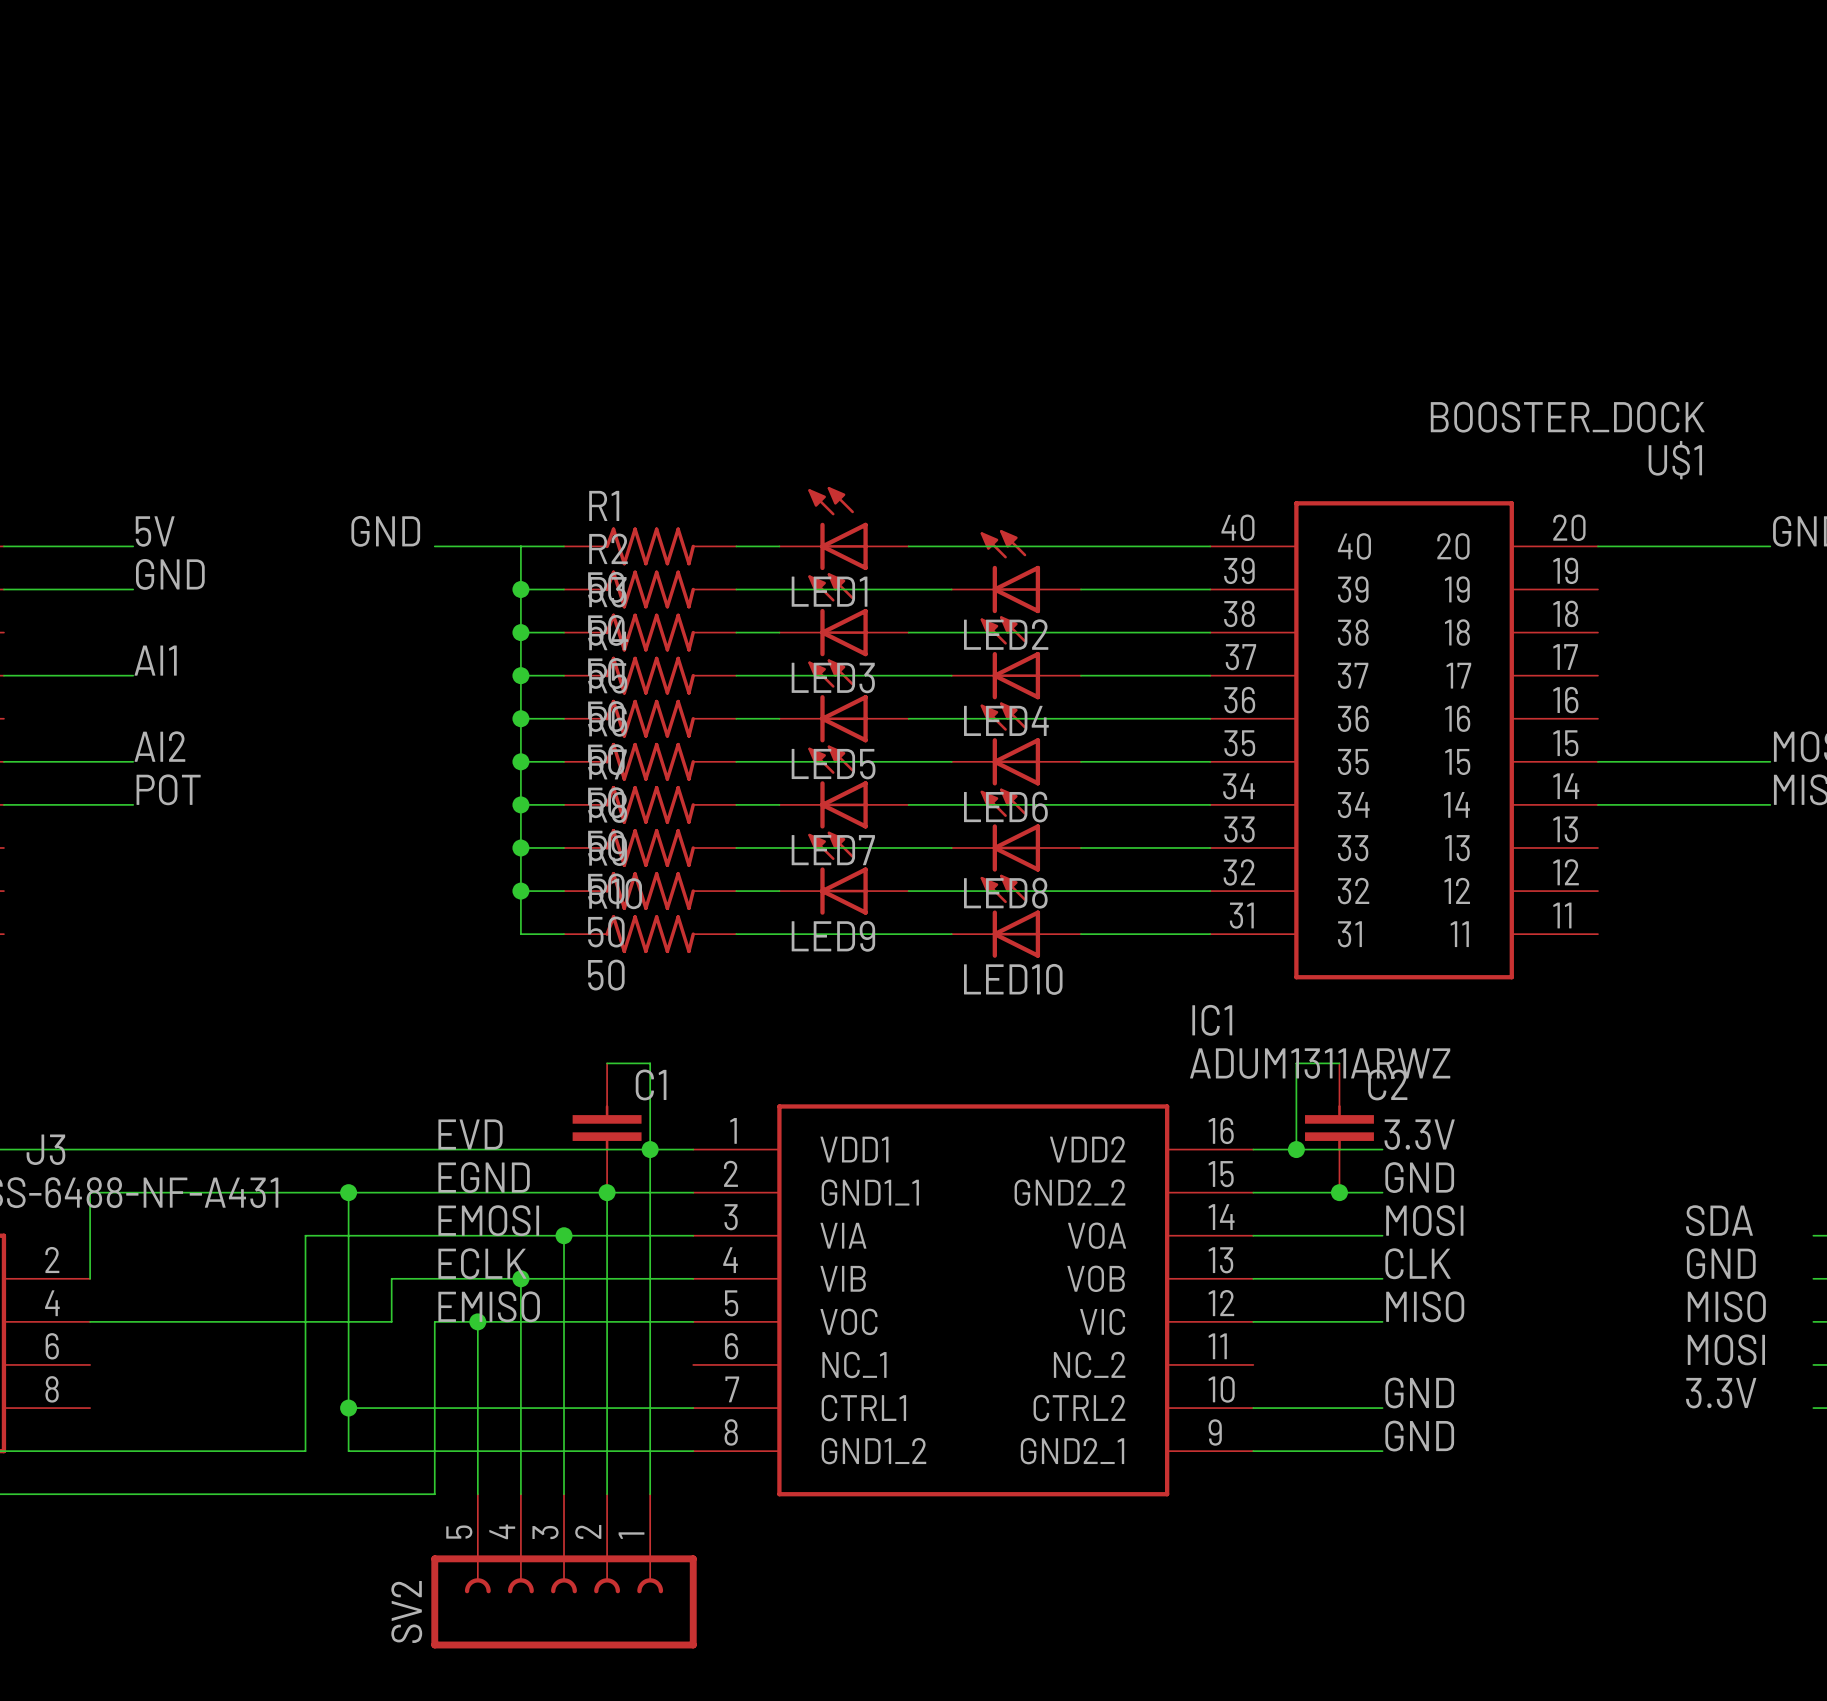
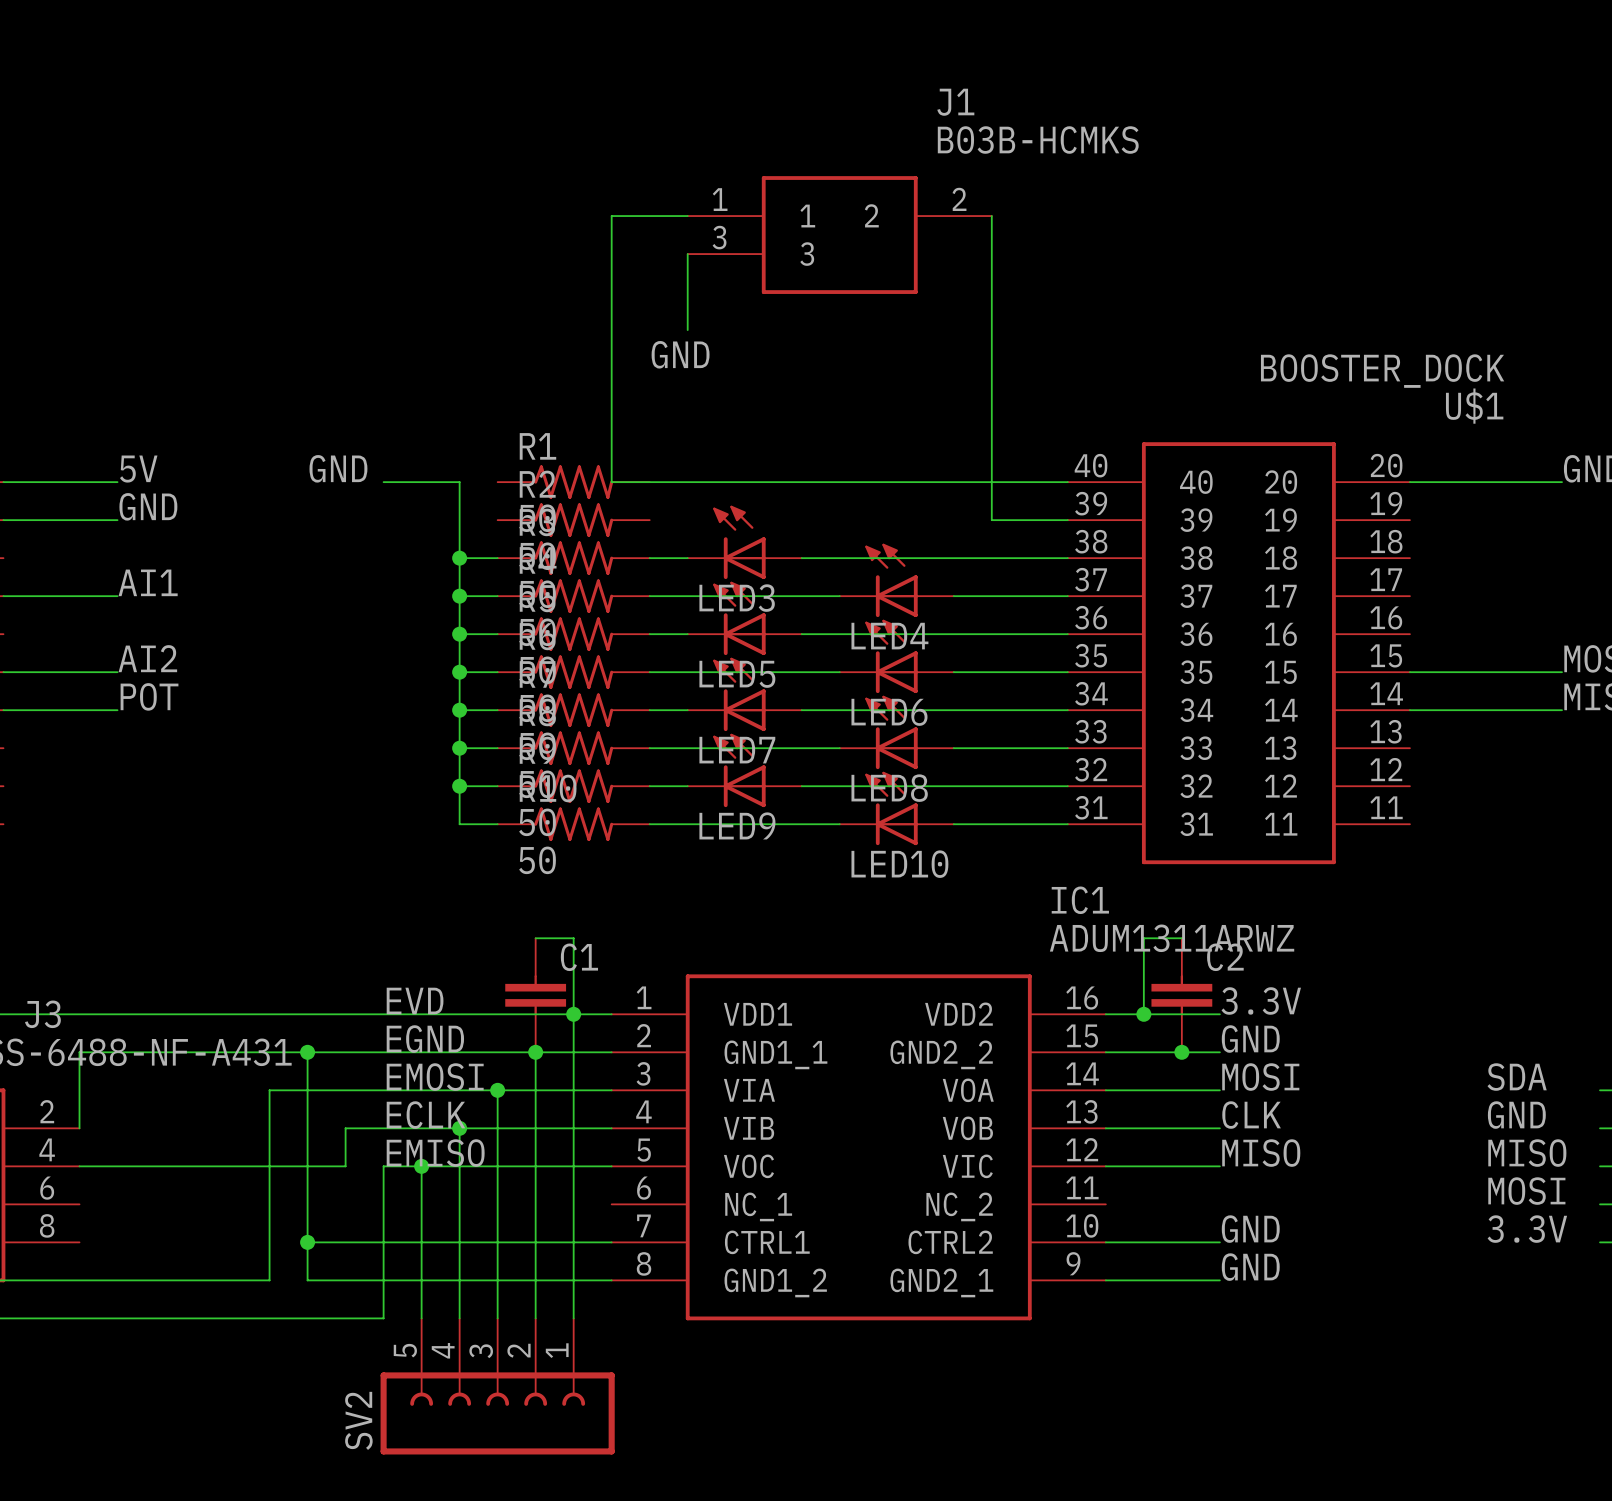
wire: none -> (687, 216) (611, 216) (611, 482) (649, 482)
J1: none -> B03B-HCMKS (839, 235)
wire: none -> (687, 254) (687, 330)
label: none -> GND (680, 354)
LED1: (844, 528) -> none
wire: (520, 546) (564, 546) -> none
LED2: (1016, 571) -> none
wire: (520, 589) (564, 589) -> none
junction: (520, 589) -> none
wire: (736, 589) (951, 589) -> none
wire: (1080, 589) (1124, 589) -> (991, 216) (991, 520)

